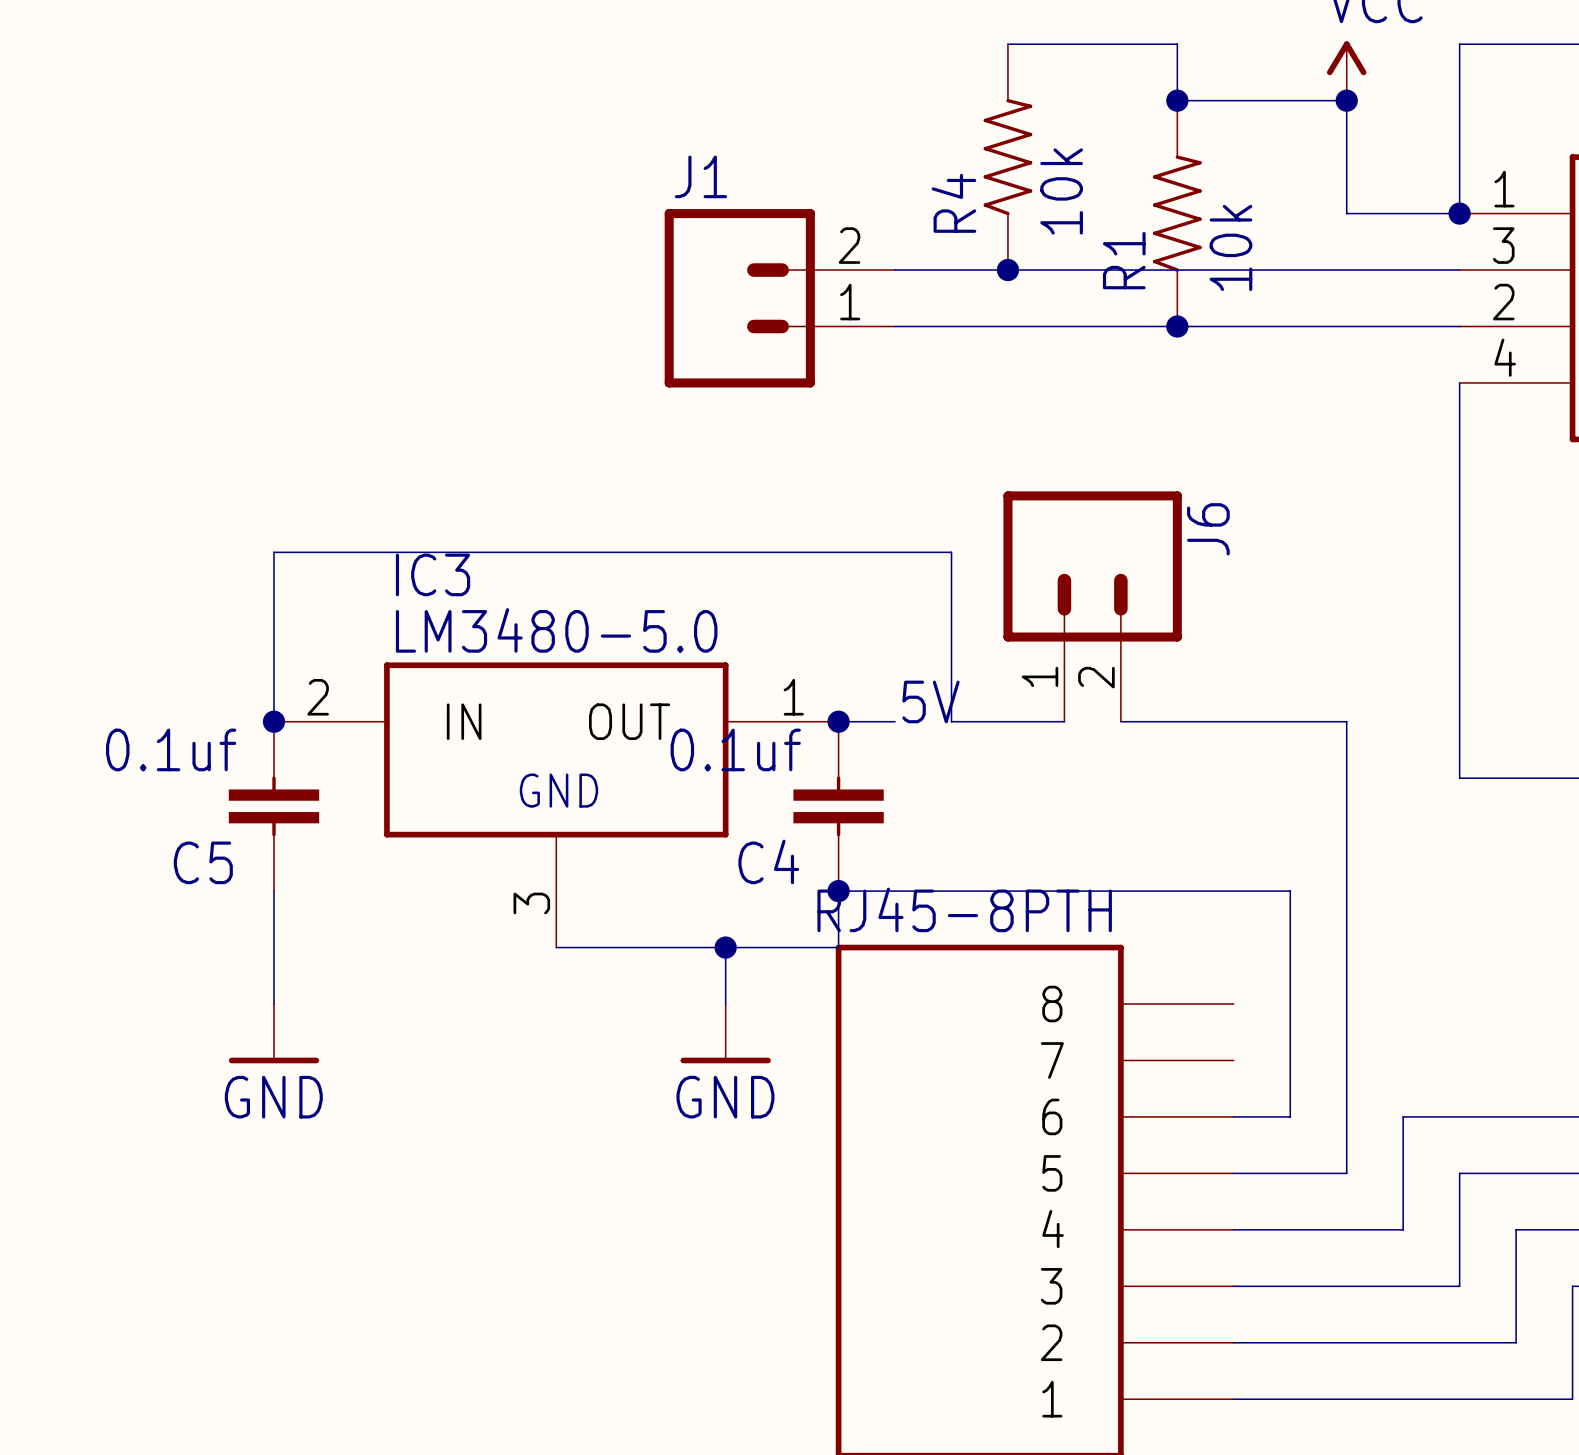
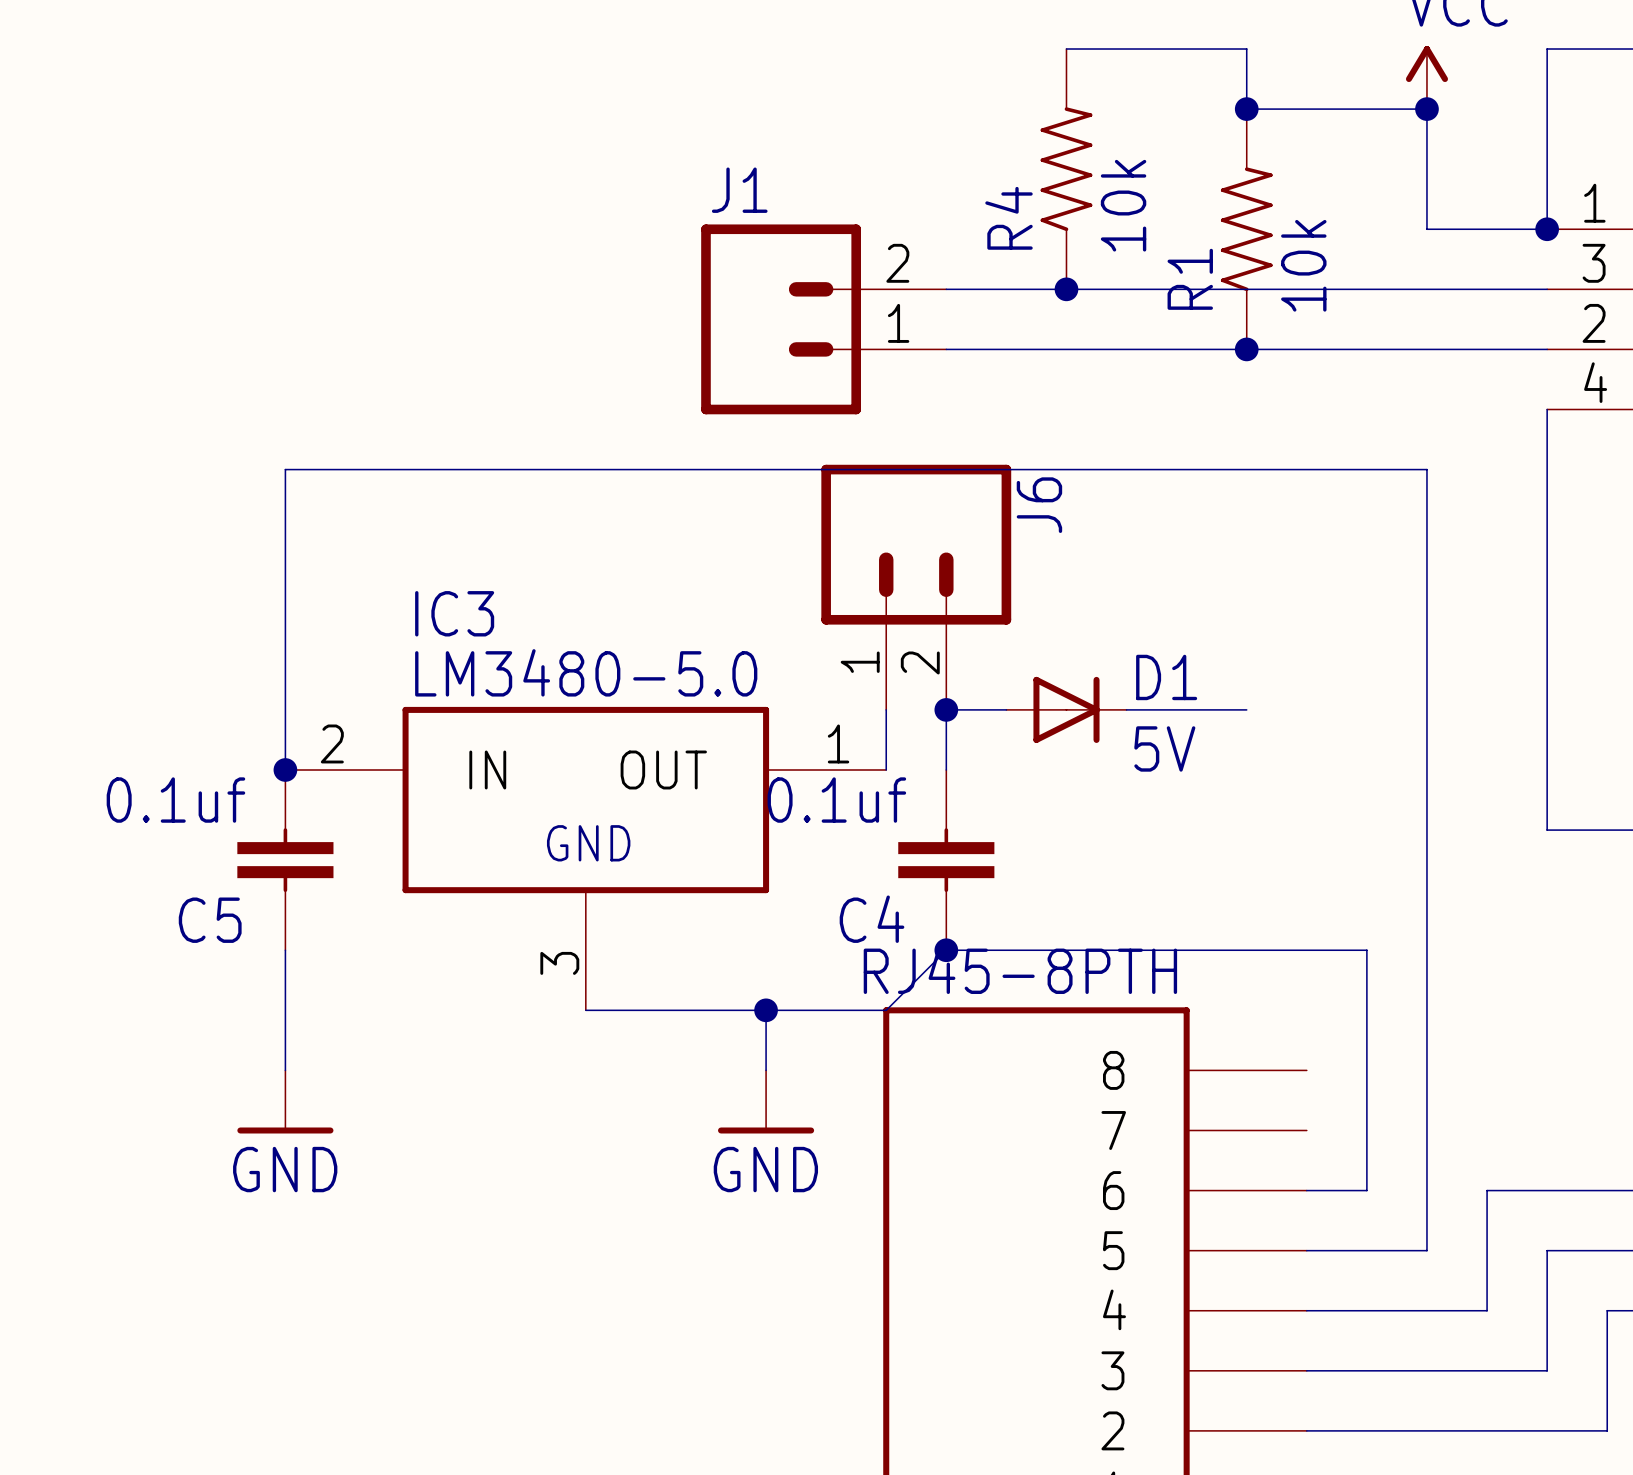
wire: (273, 552) (951, 552) (951, 721) (1064, 721) -> (285, 589) (285, 469) (1426, 469) (1426, 769)
J6 position: (1092, 606) -> (916, 587)
wire: none -> (1006, 709) (946, 709) (946, 769)
D1: none -> (1066, 709)
wire: none -> (1126, 709) (1246, 709)
text position: 5V (931, 701) -> 5V (1164, 748)
wire: (838, 721) (895, 721) -> (886, 769) (886, 709)
junction position: (838, 721) -> (946, 709)
wire: (1120, 721) (1346, 721) -> none
C4 position: (838, 806) -> (946, 860)
junction position: (838, 891) -> (946, 950)
wire: (895, 891) (838, 891) (838, 947) -> (946, 950) (886, 1010)

